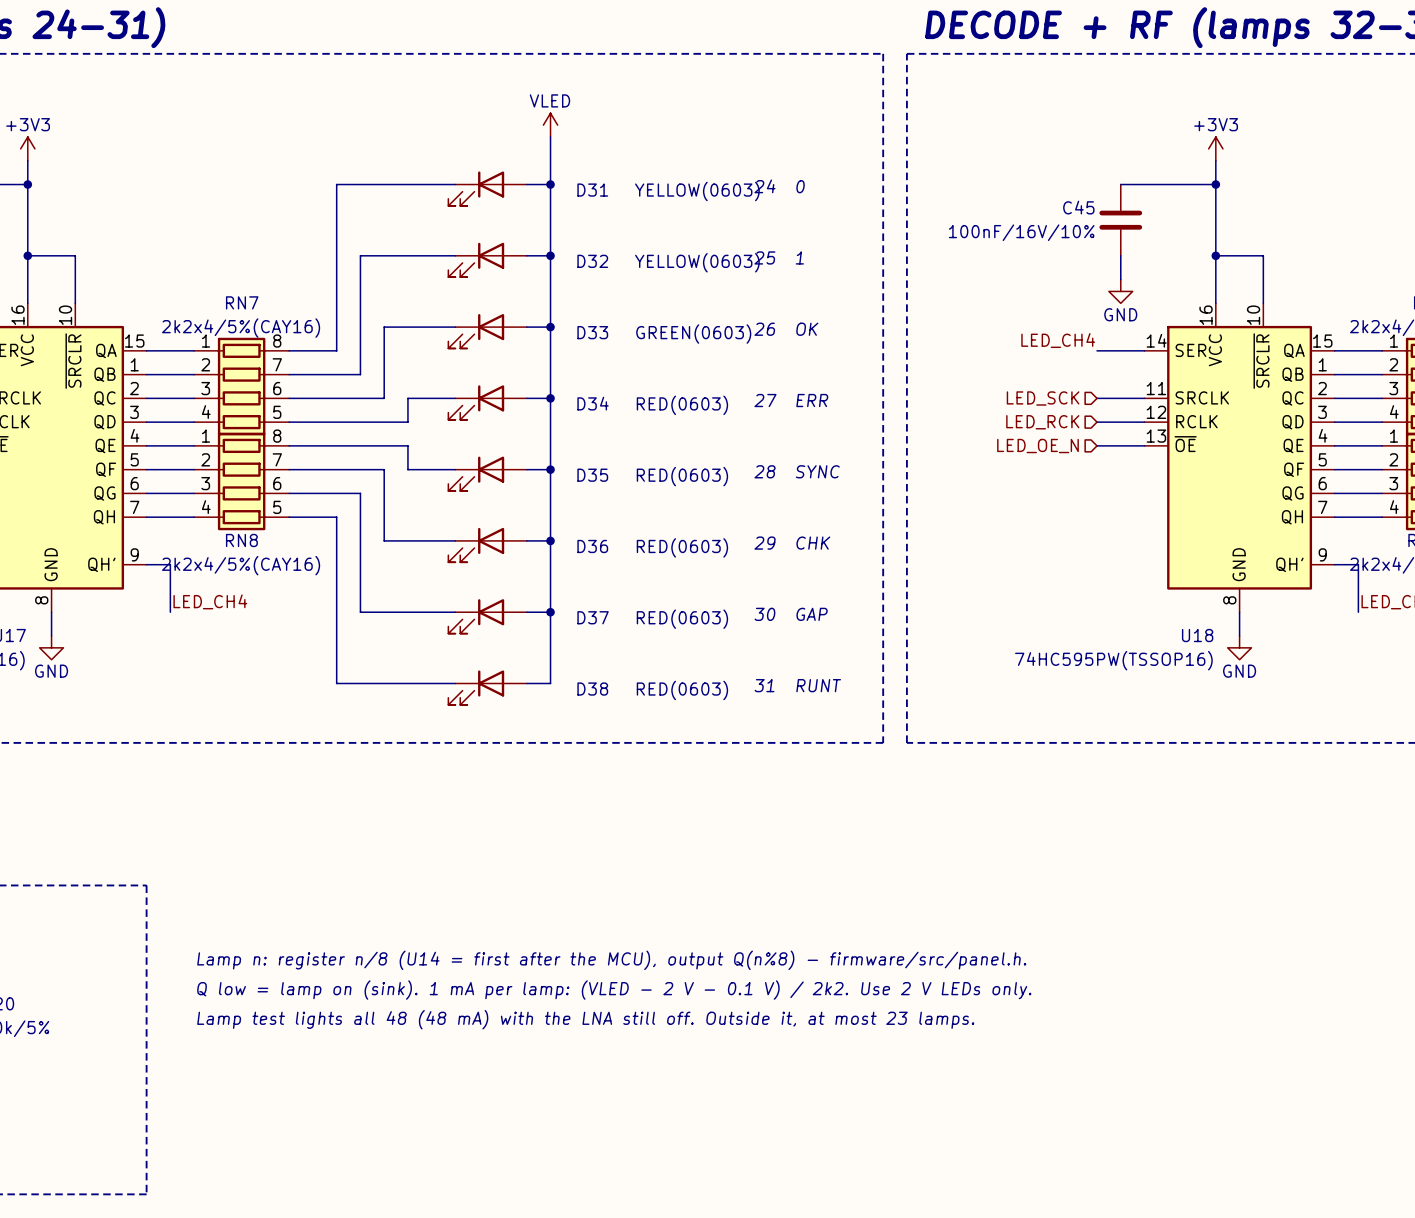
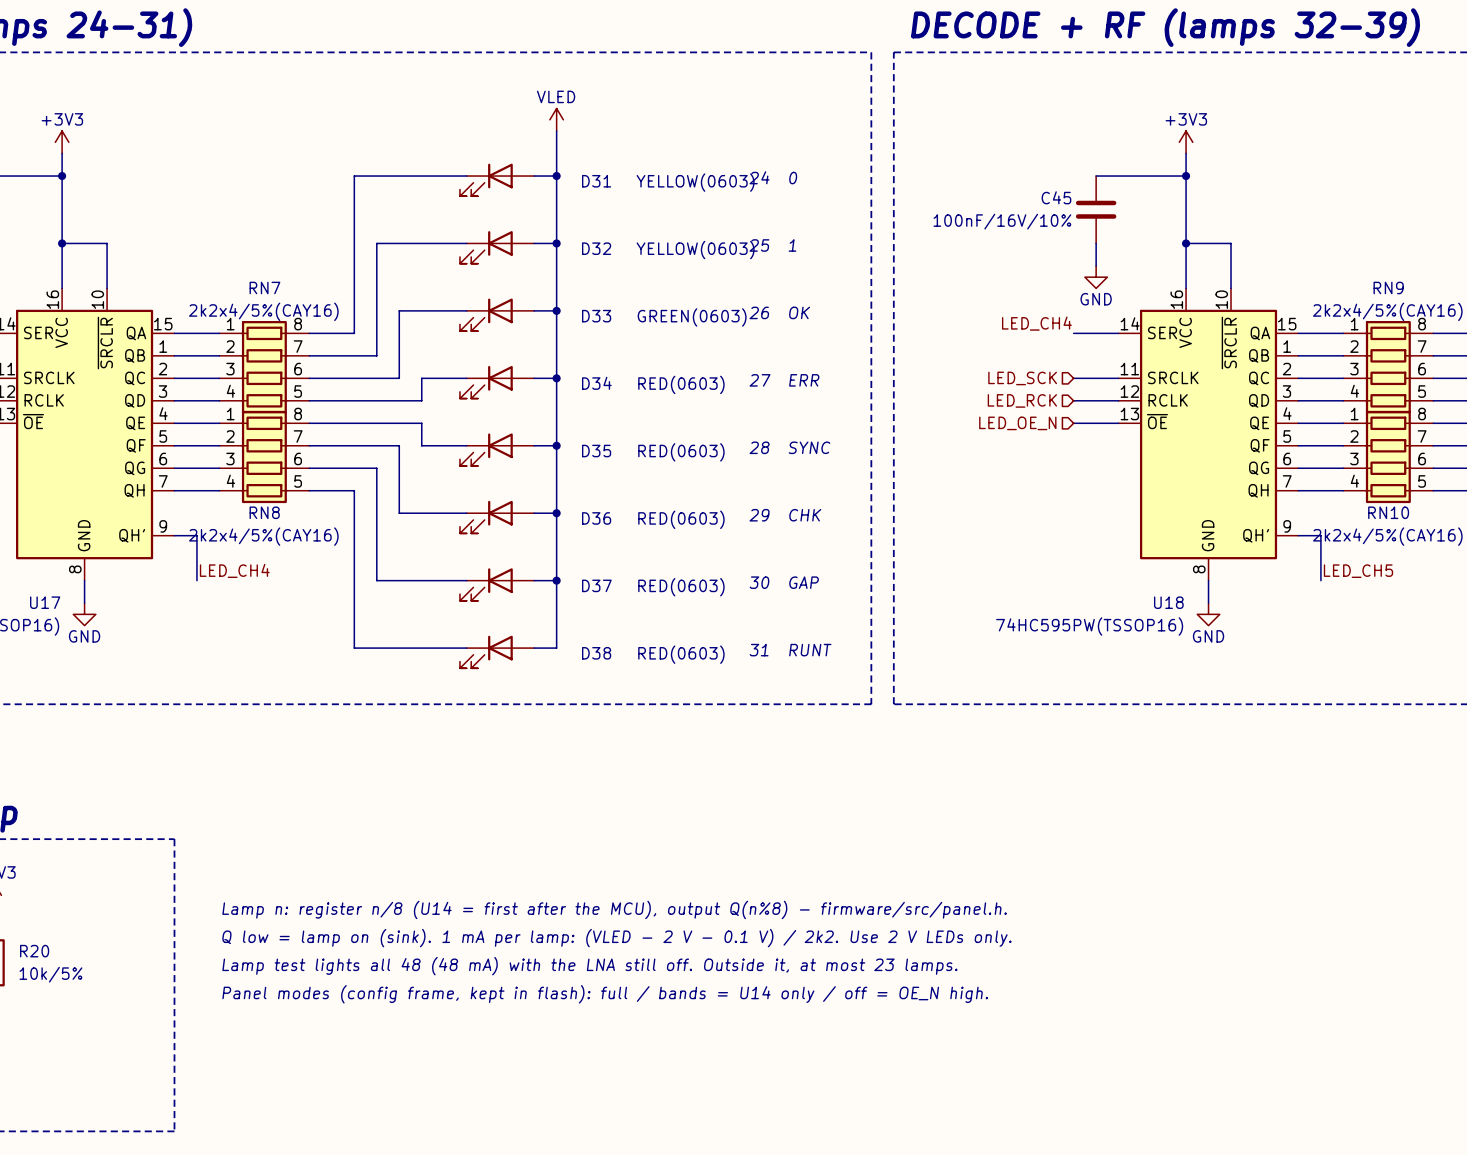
text: none -> Panel modes (config frame, kept in flash): full / bands = U14 only / off = OE_N high. (605, 994)

